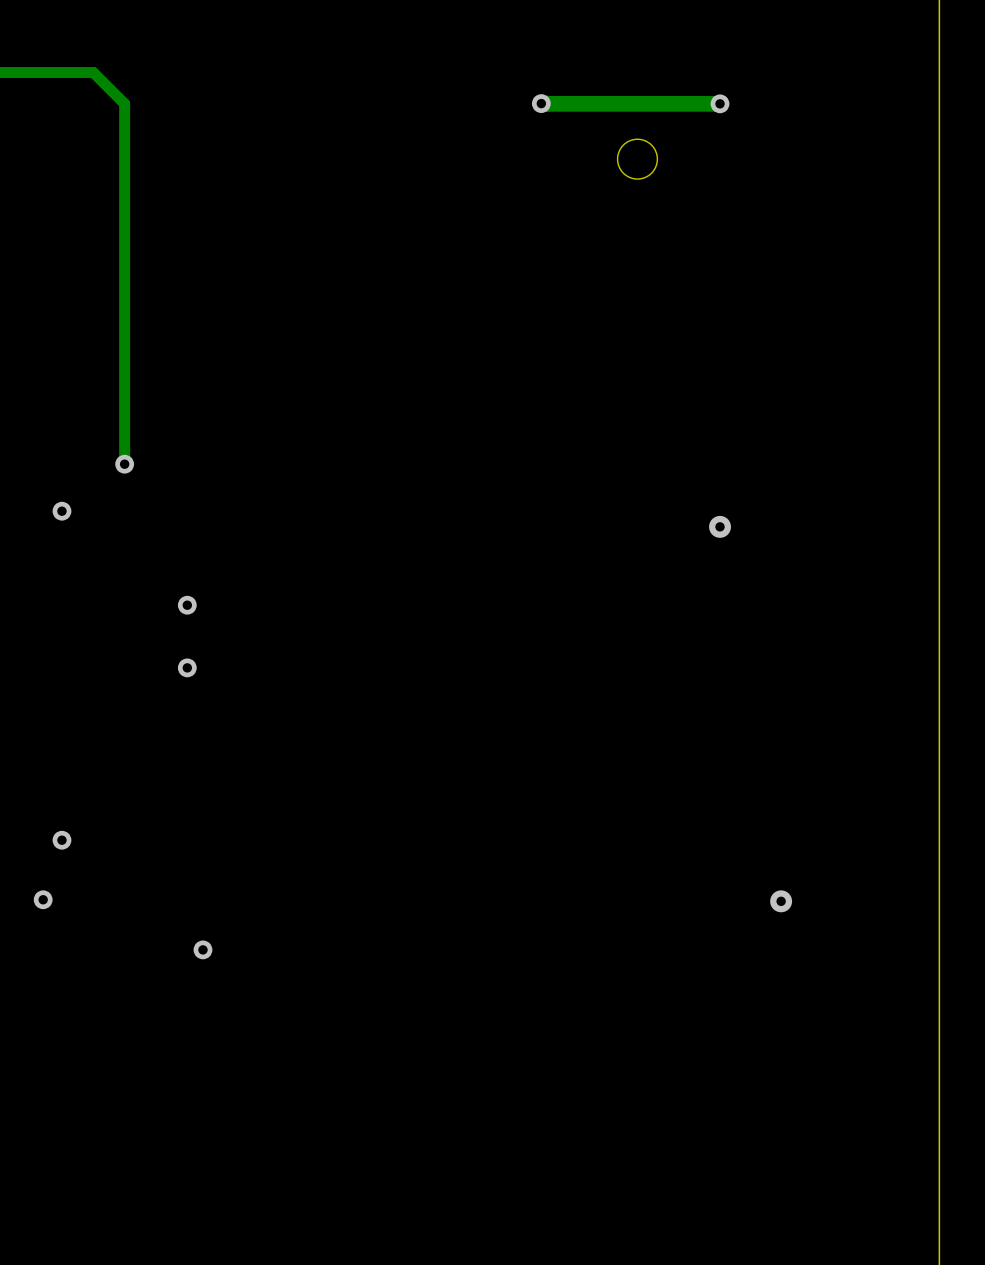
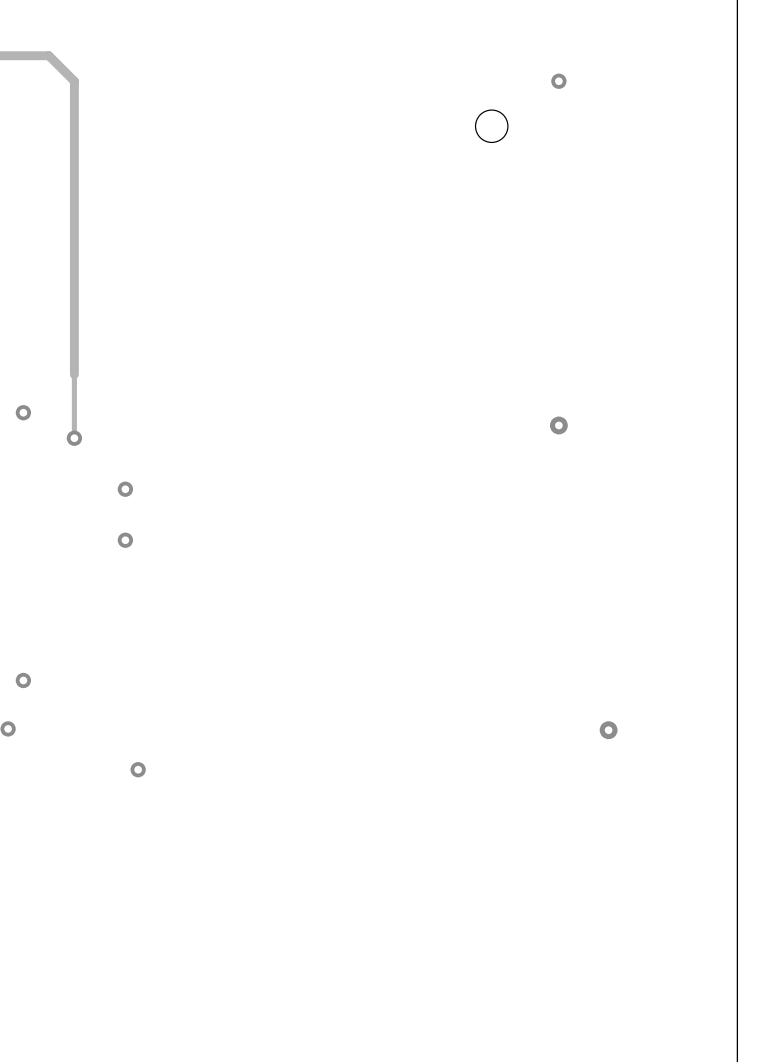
via: (541, 103) -> none
track: (720, 103) (547, 103) -> none
track: none -> (74, 374) (74, 438)
via position: (124, 464) -> (74, 438)

